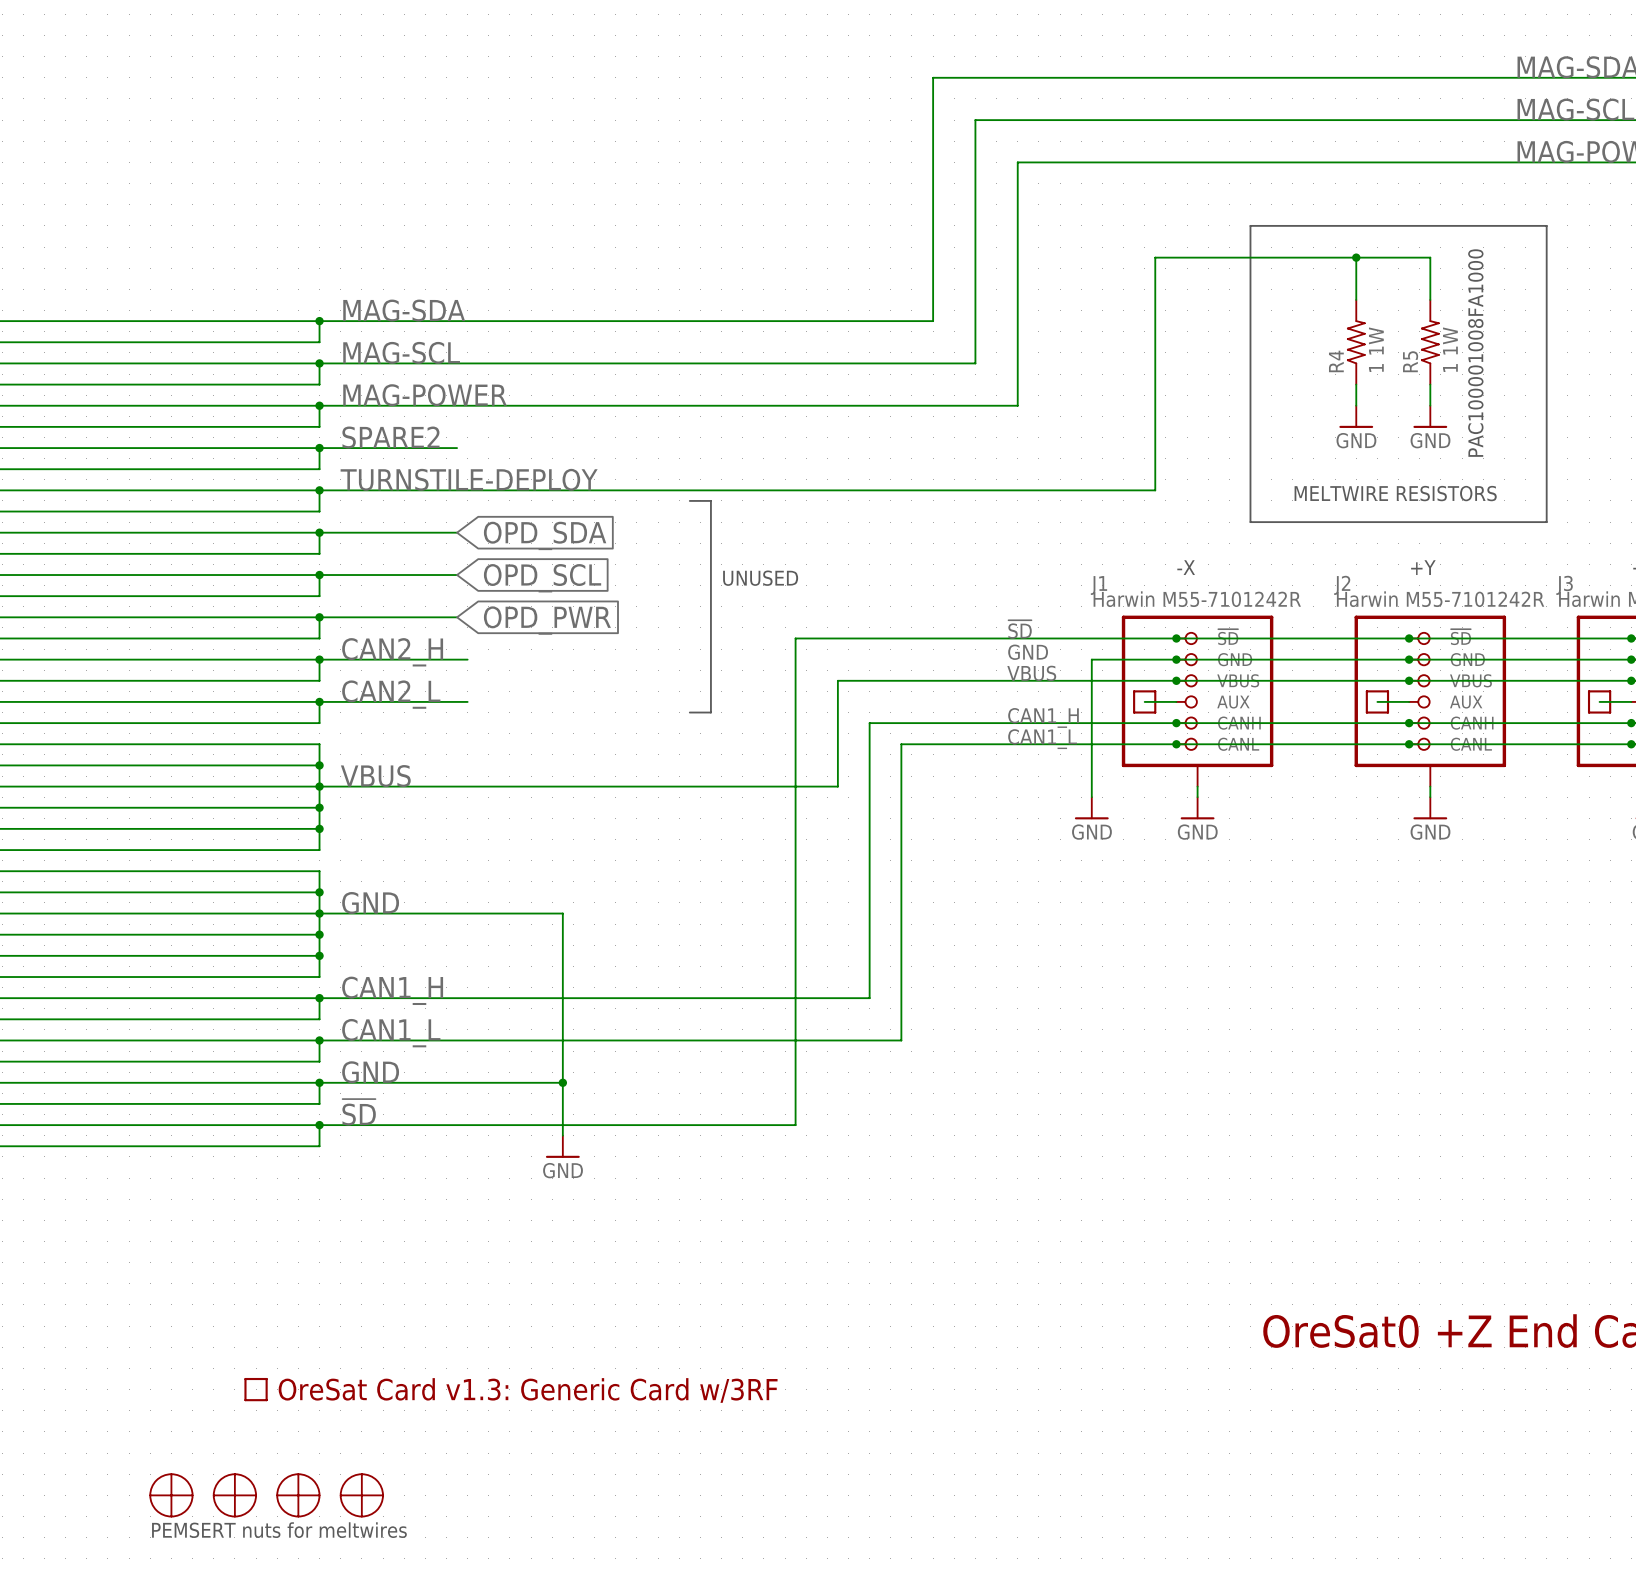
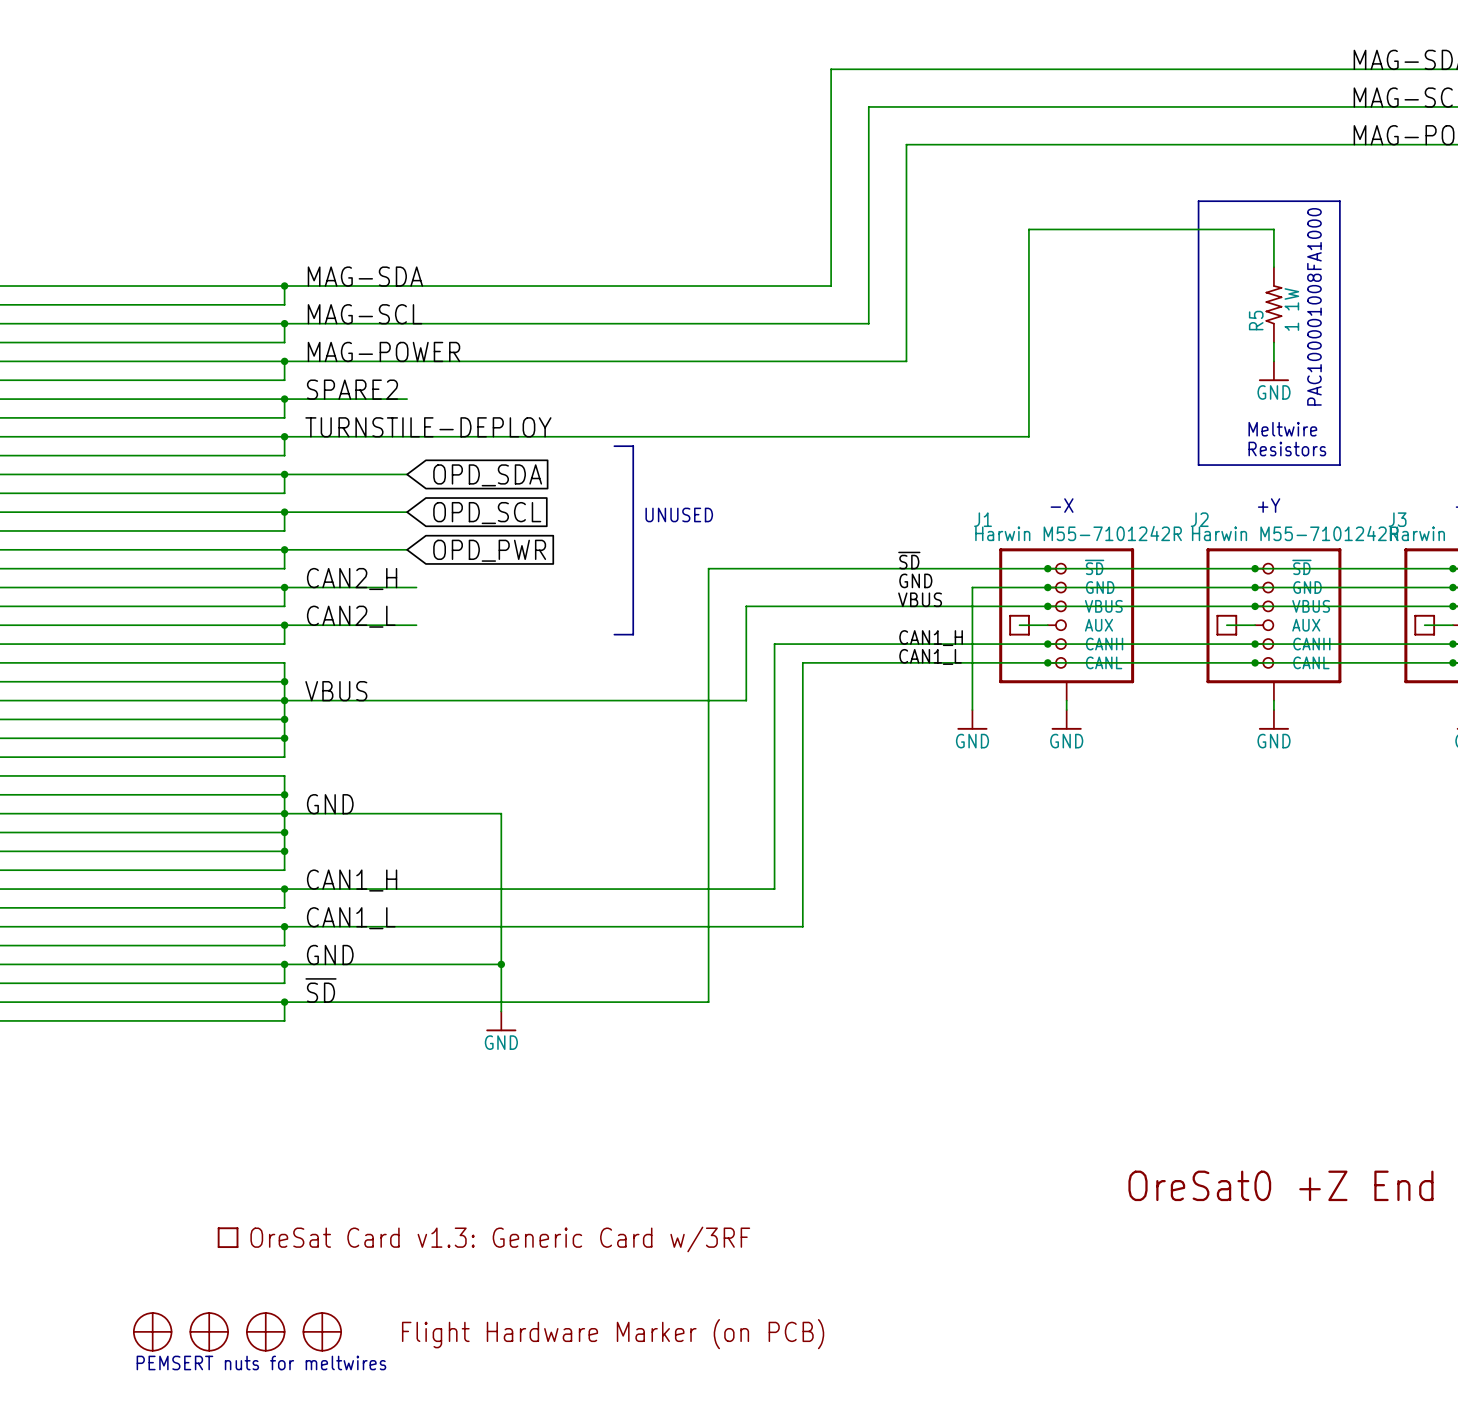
line: (1345, 225) (1250, 225) (1250, 522) (1345, 522) -> (1198, 201) (1198, 465)
line: (1504, 225) (1546, 225) (1546, 522) (1504, 522) -> (1339, 201) (1339, 465)
wire: (1356, 257) (1356, 299) -> none
junction: (1356, 257) -> none
R4: 1 1W (1356, 342) -> none
wire: (1356, 384) (1356, 405) -> none
power symbol: GND (1356, 416) -> none
text: none -> Meltwire (1282, 429)
text: MELTWIRE RESISTORS (1395, 493) -> none
text: none -> Resistors (1287, 449)
part: none -> (613, 1334)

